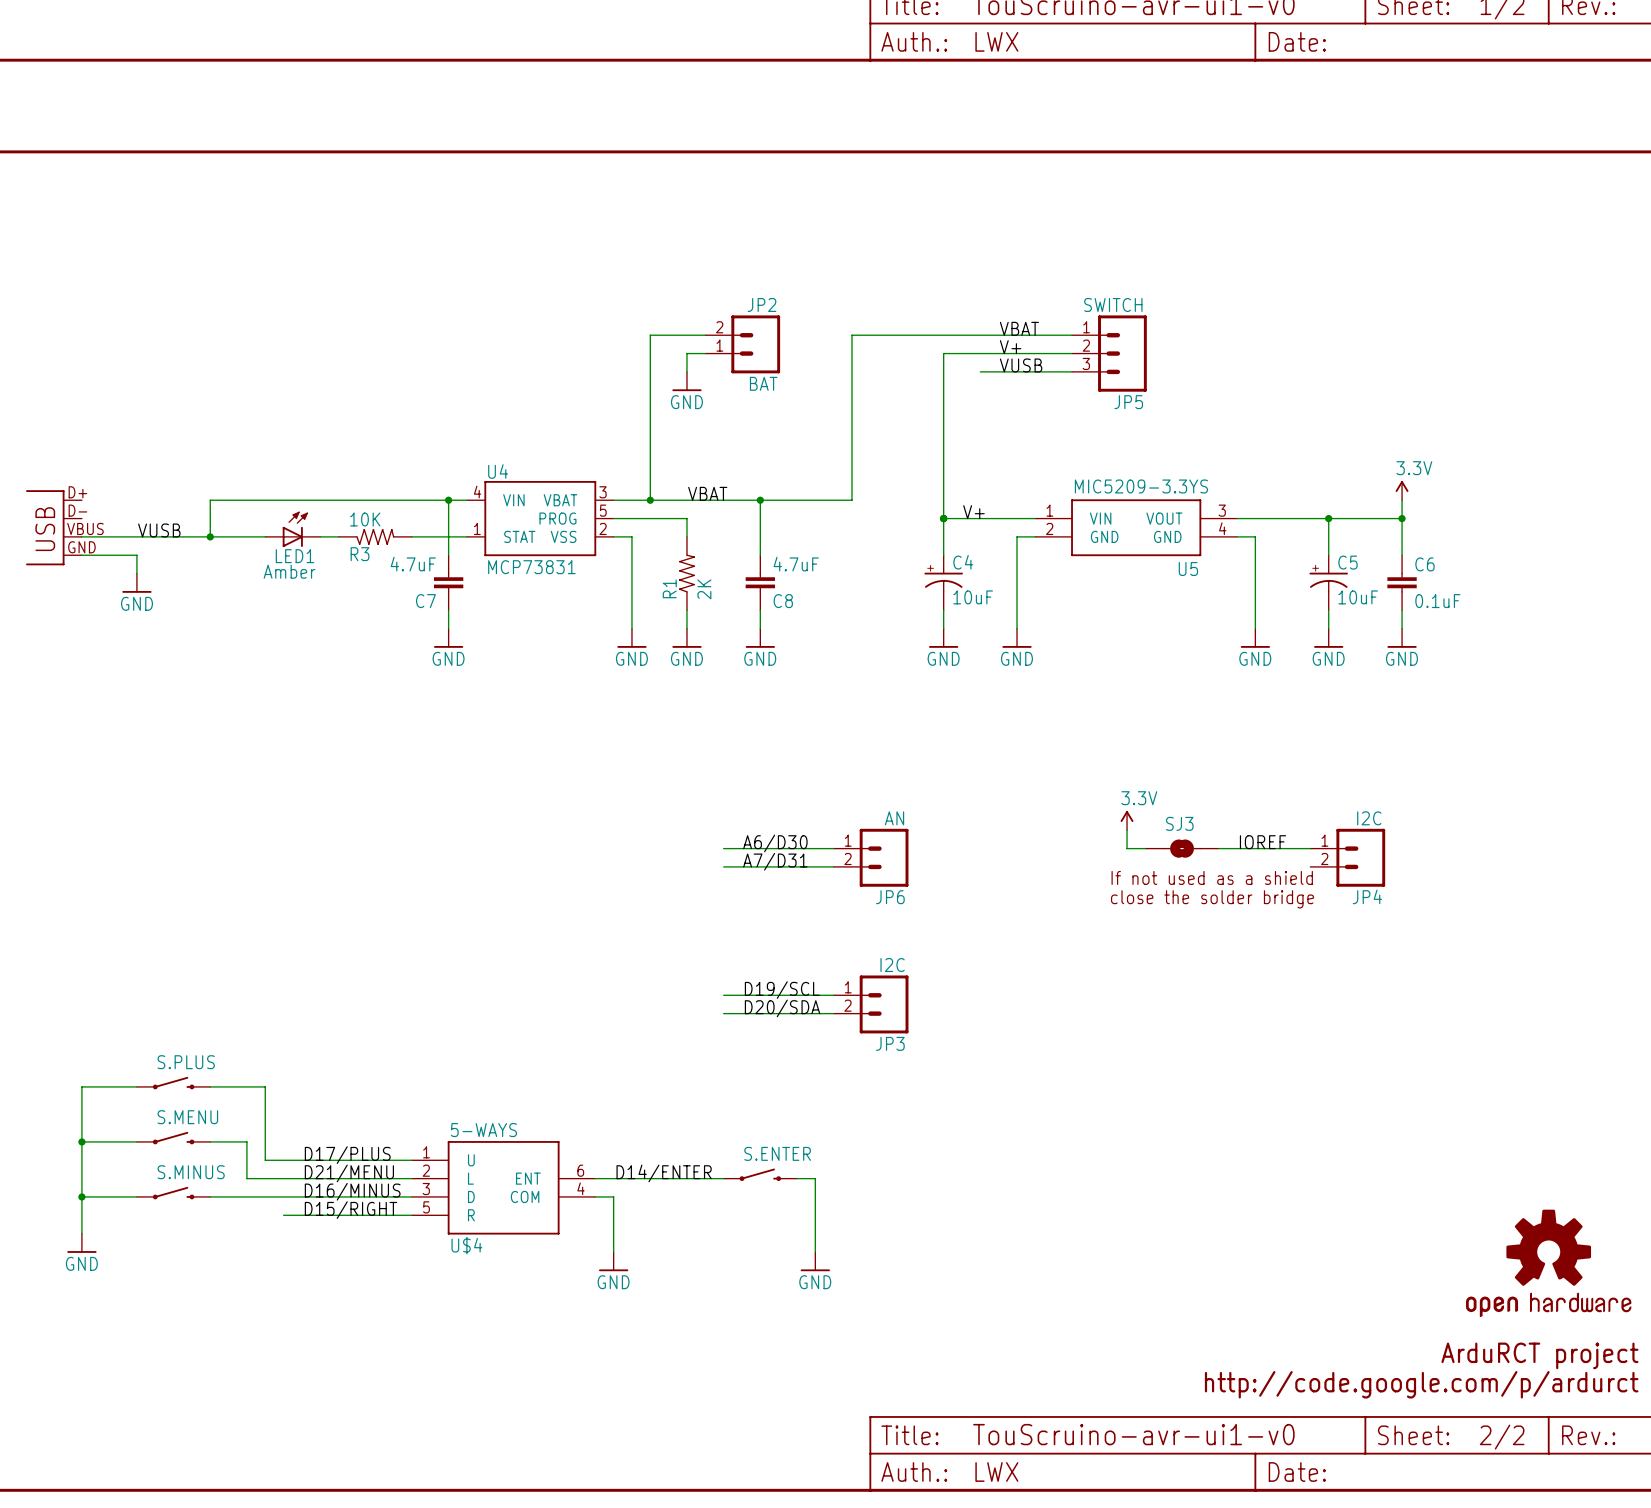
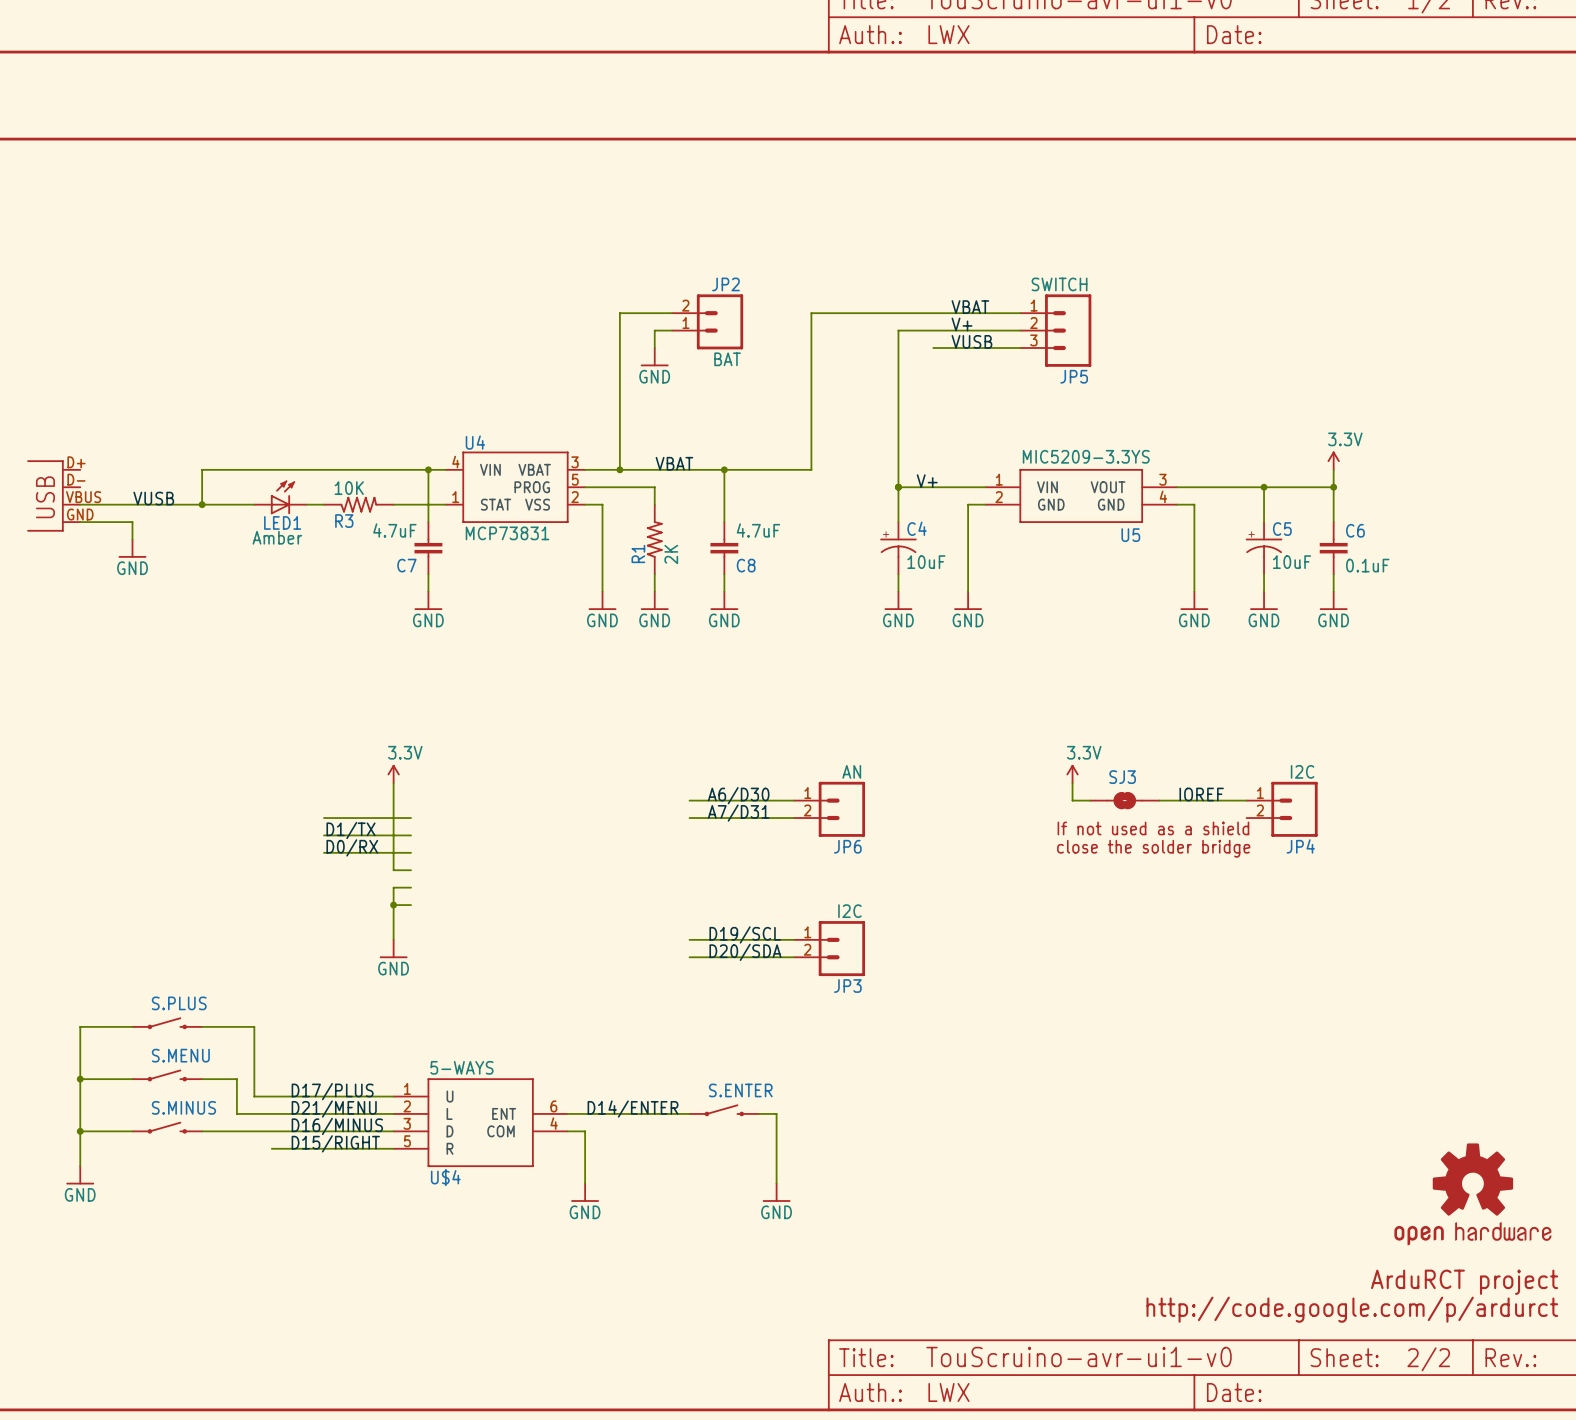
power symbol: none -> 3.3V (393, 774)
wire: none -> (393, 783) (393, 870) (411, 870)
wire: none -> (323, 818) (411, 818)
label: none -> D1/TX (350, 830)
wire: none -> (323, 835) (411, 835)
label: none -> D0/RX (352, 847)
wire: none -> (323, 852) (411, 852)
wire: none -> (411, 887) (393, 887) (393, 939)
wire: none -> (393, 905) (411, 905)
junction: none -> (393, 905)
power symbol: none -> GND (393, 949)

